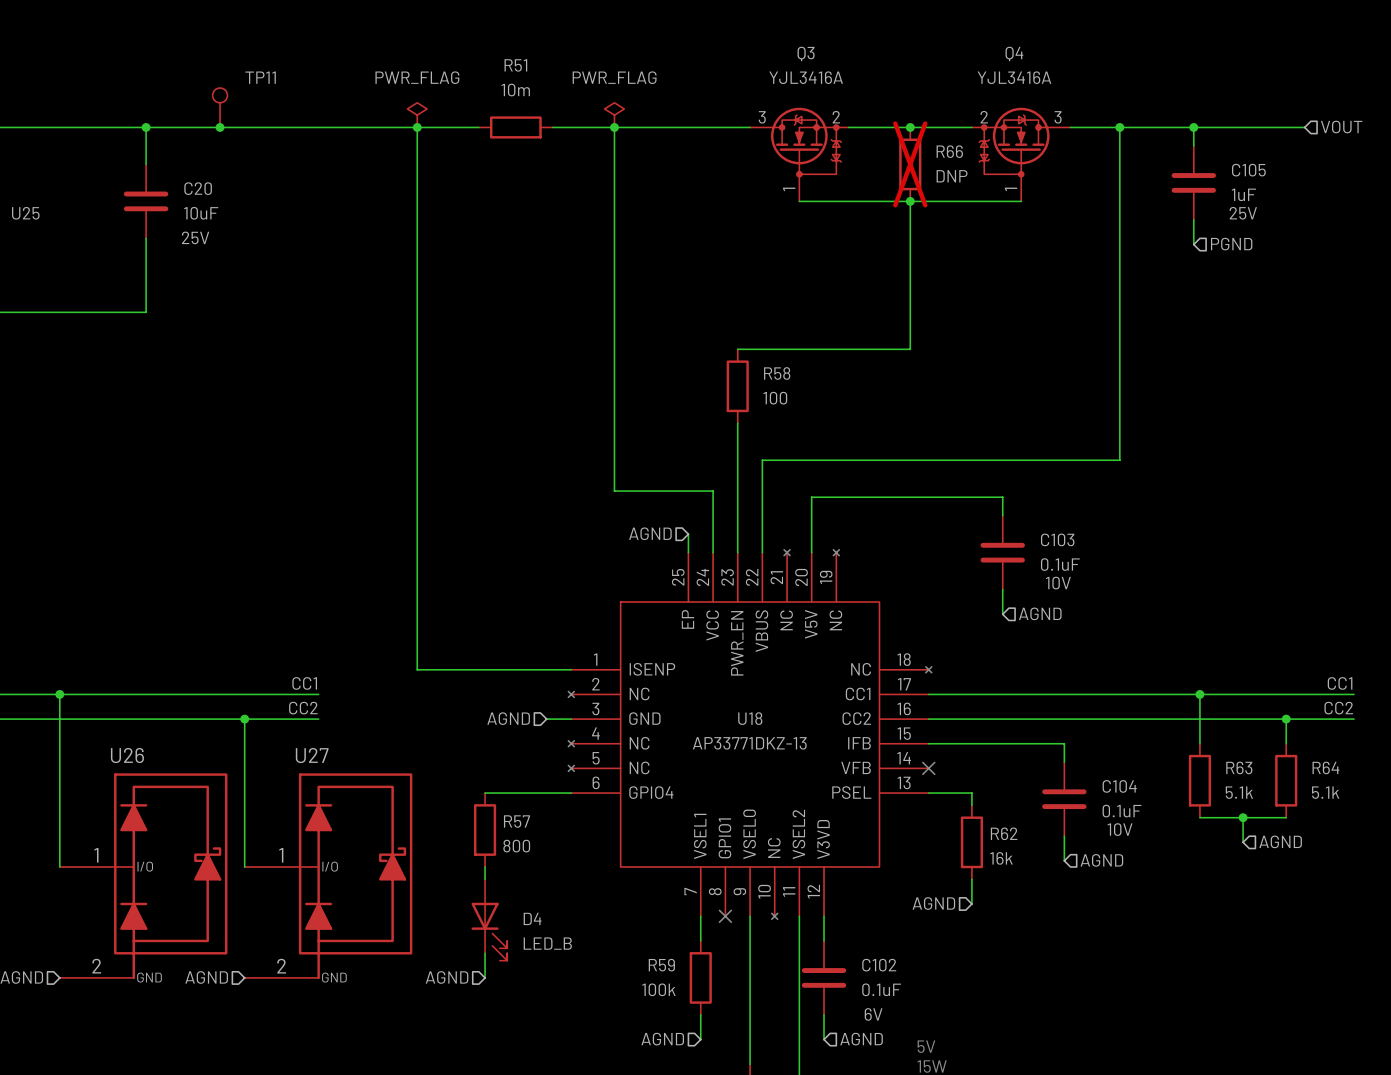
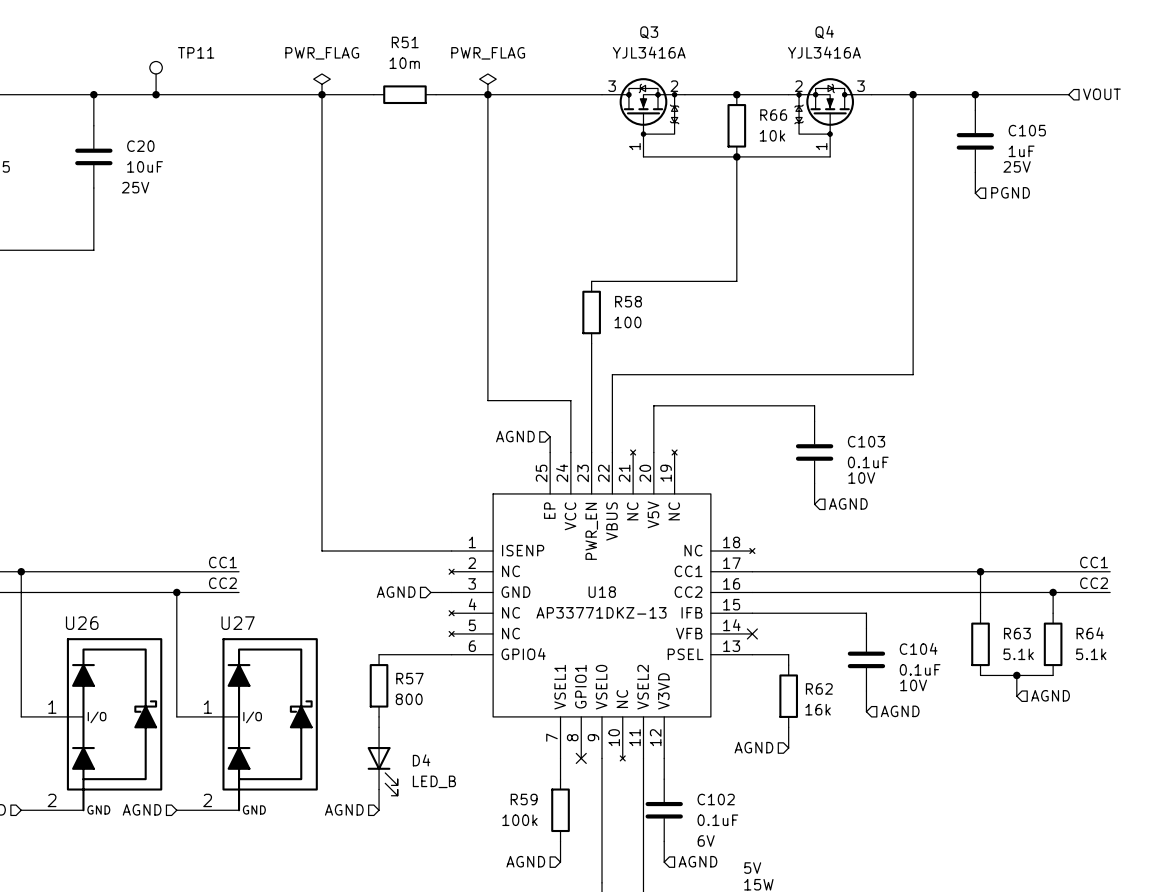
R66 do-not-place cross: (910, 164) -> none
R66 value: DNP (952, 176) -> 10k (772, 135)

